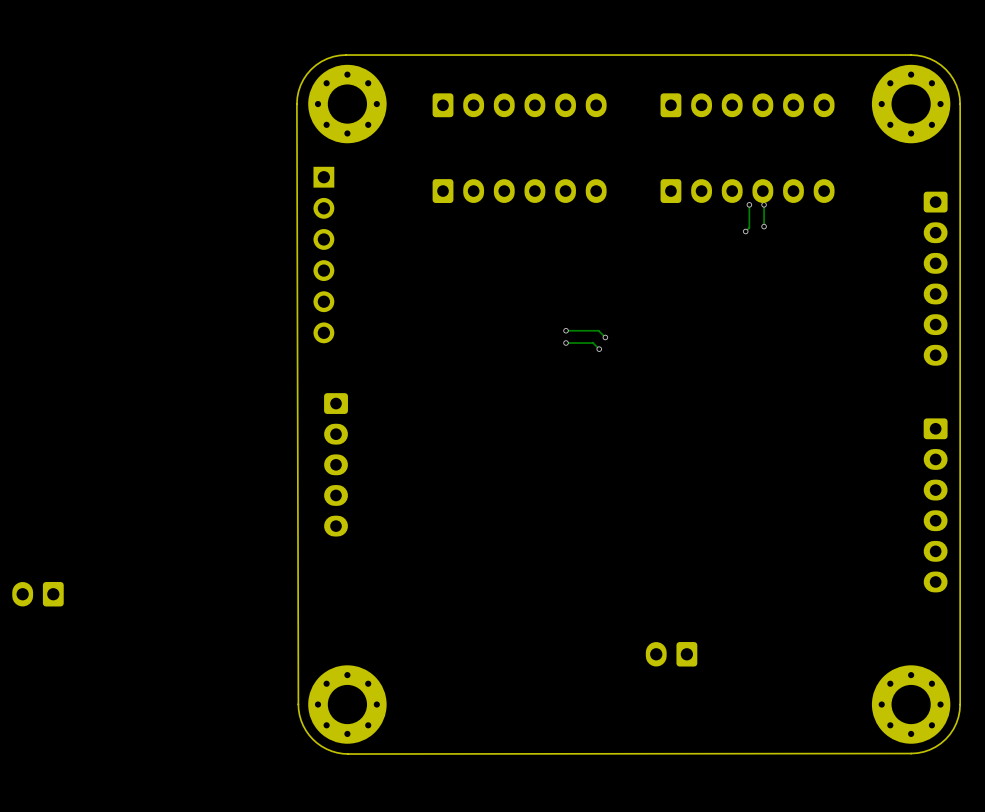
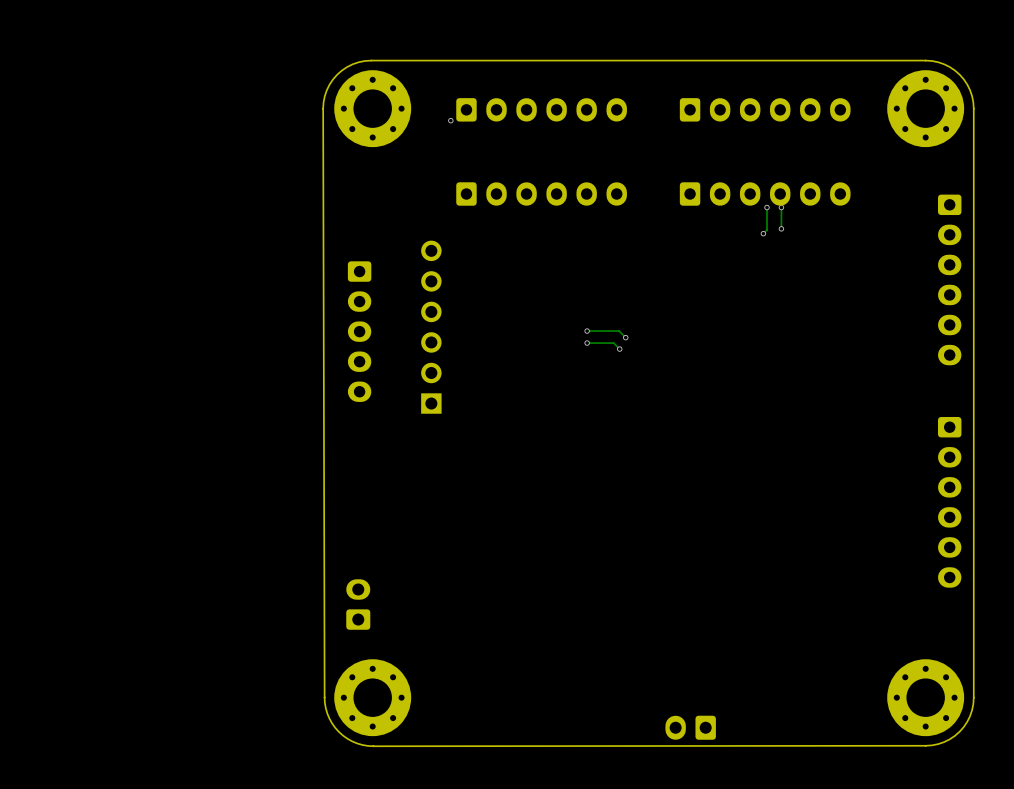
via: none -> (450, 120)
part rotation: 0° (323, 255) -> 180° (431, 327)
part position: (323, 255) -> (431, 327)
part position: (336, 464) -> (359, 331)
part: (37, 594) -> none
part: none -> (358, 604)
part position: (671, 654) -> (690, 727)

